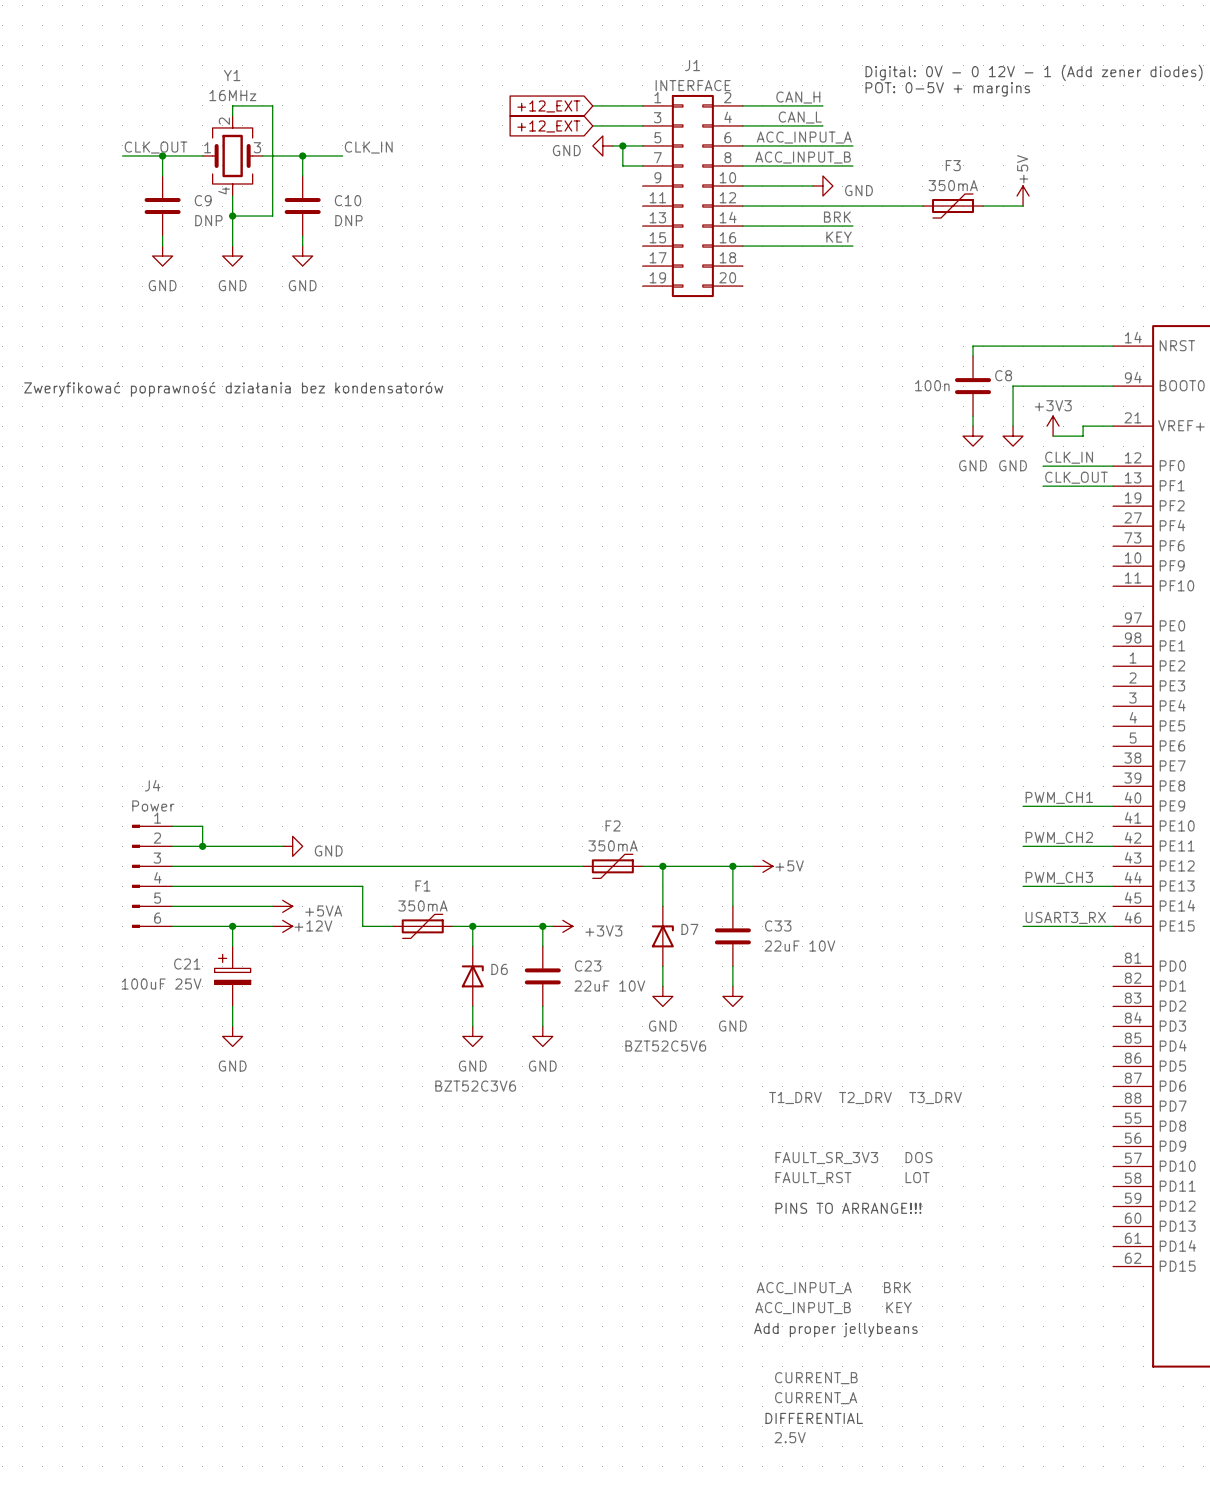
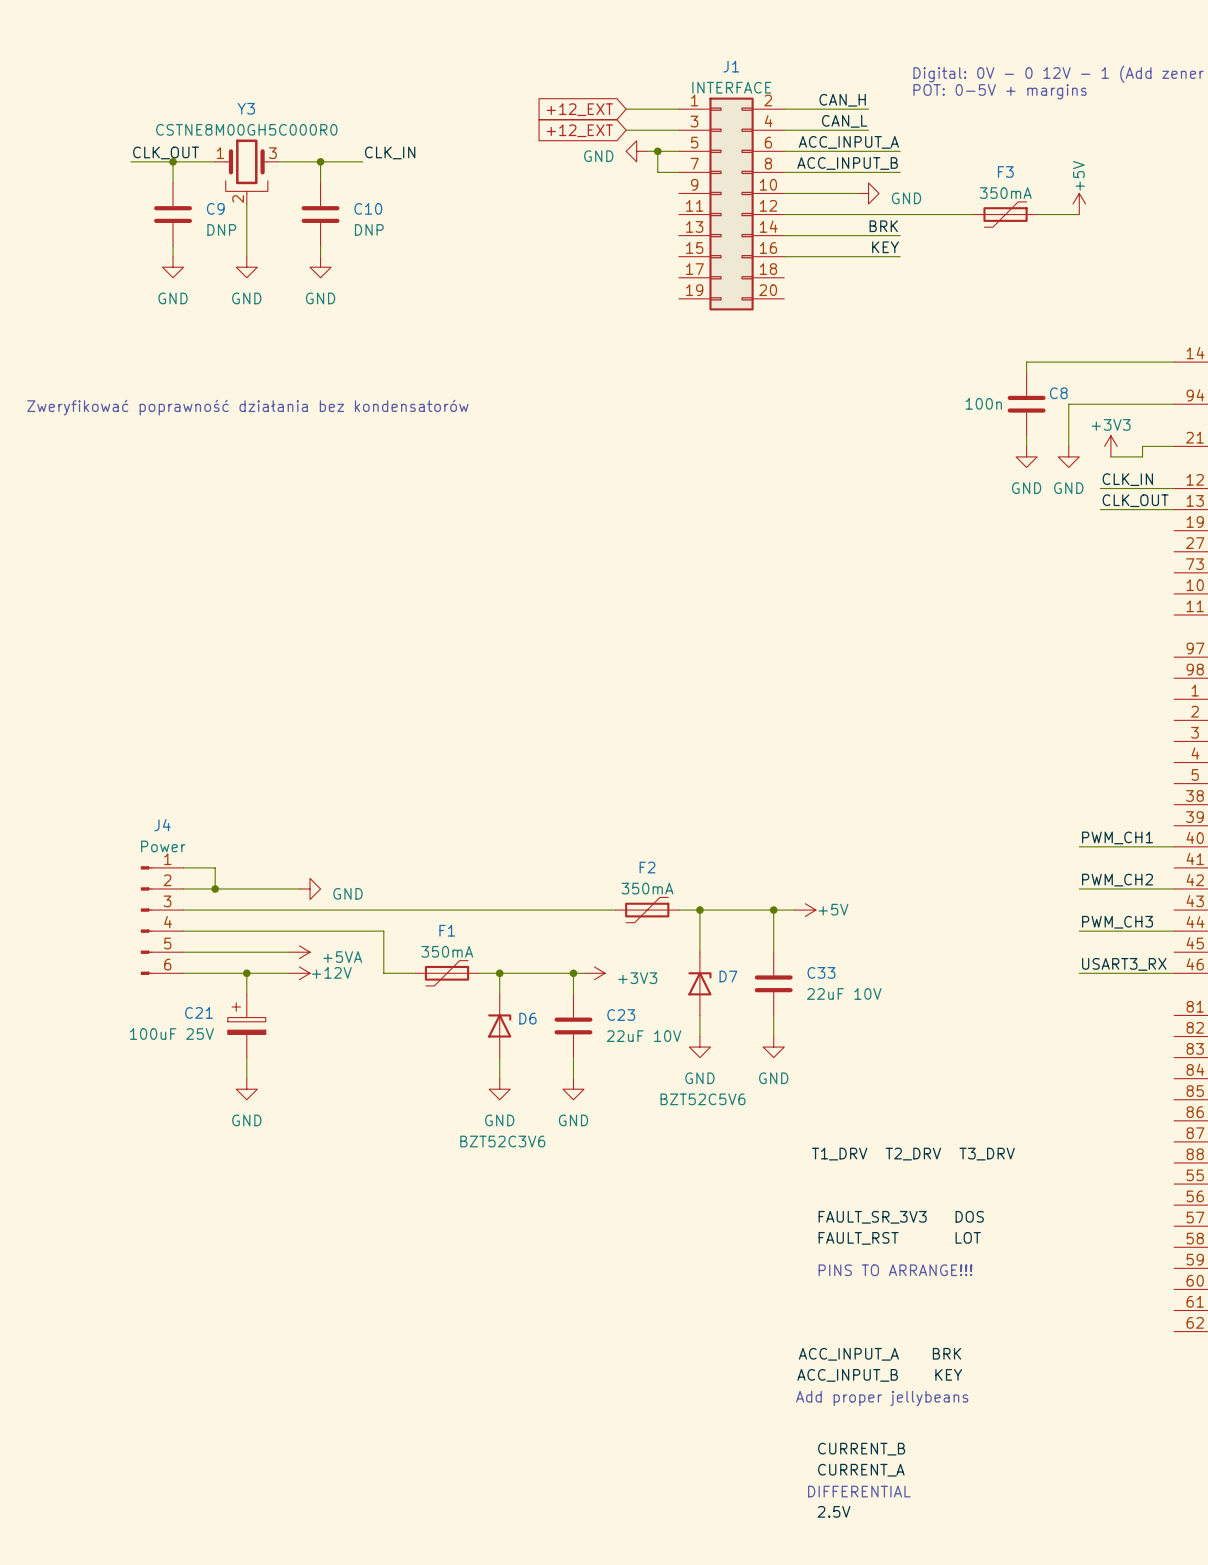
wire: (232, 115) (232, 105) (272, 105) (272, 216) (232, 216) -> none
Y1: 16MHz (232, 155) -> none
Y3: none -> CSTNE8M00GH5C000R0 (246, 171)
junction: (232, 216) -> none

